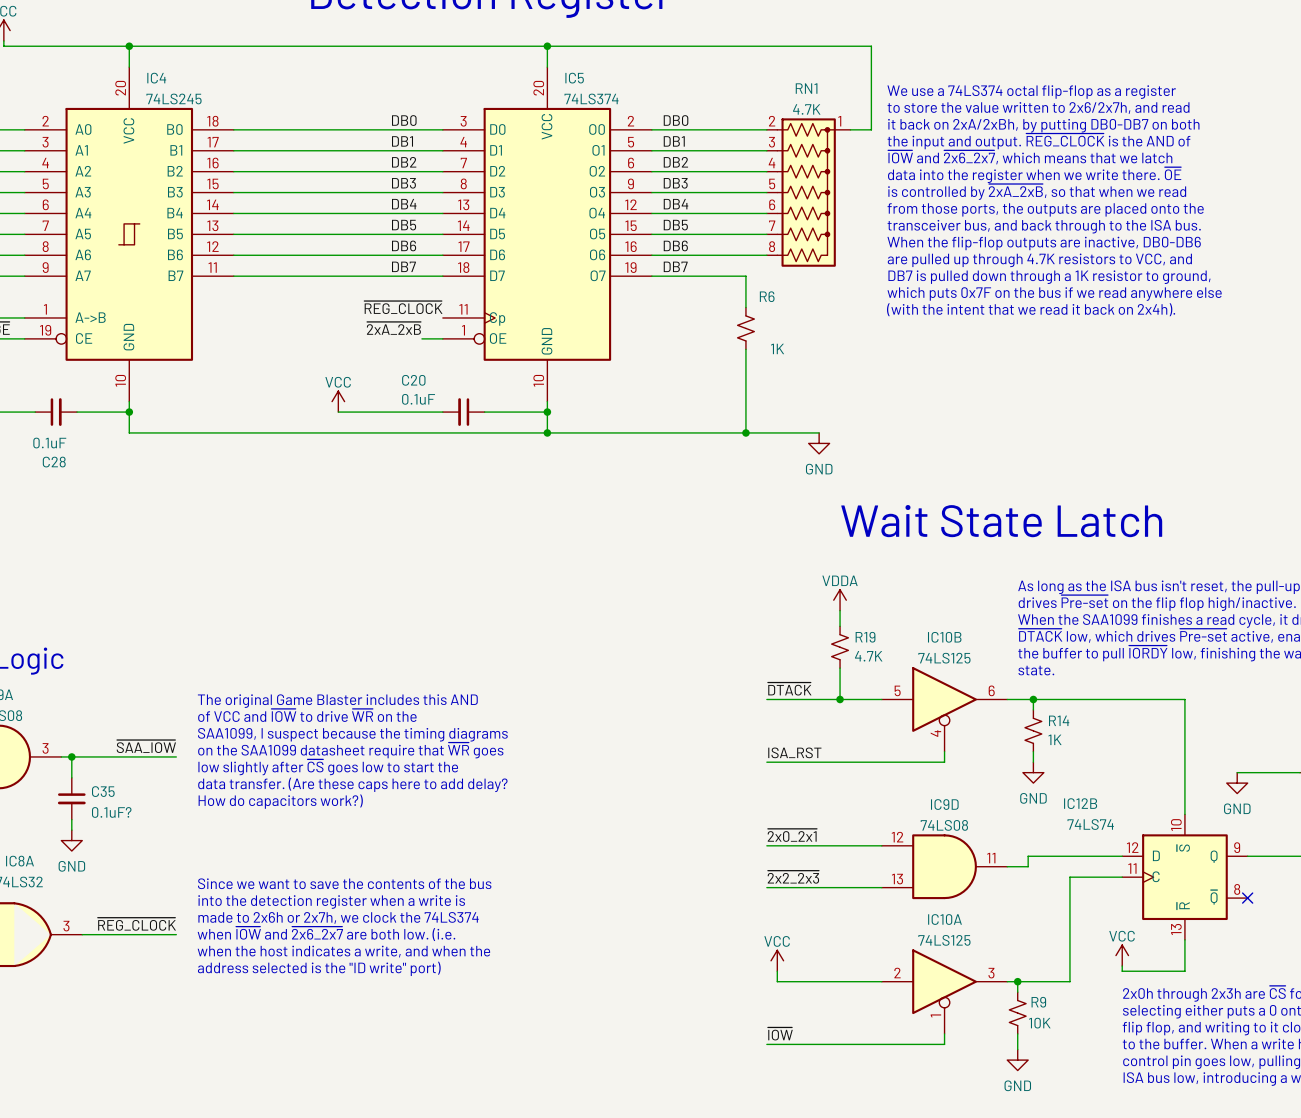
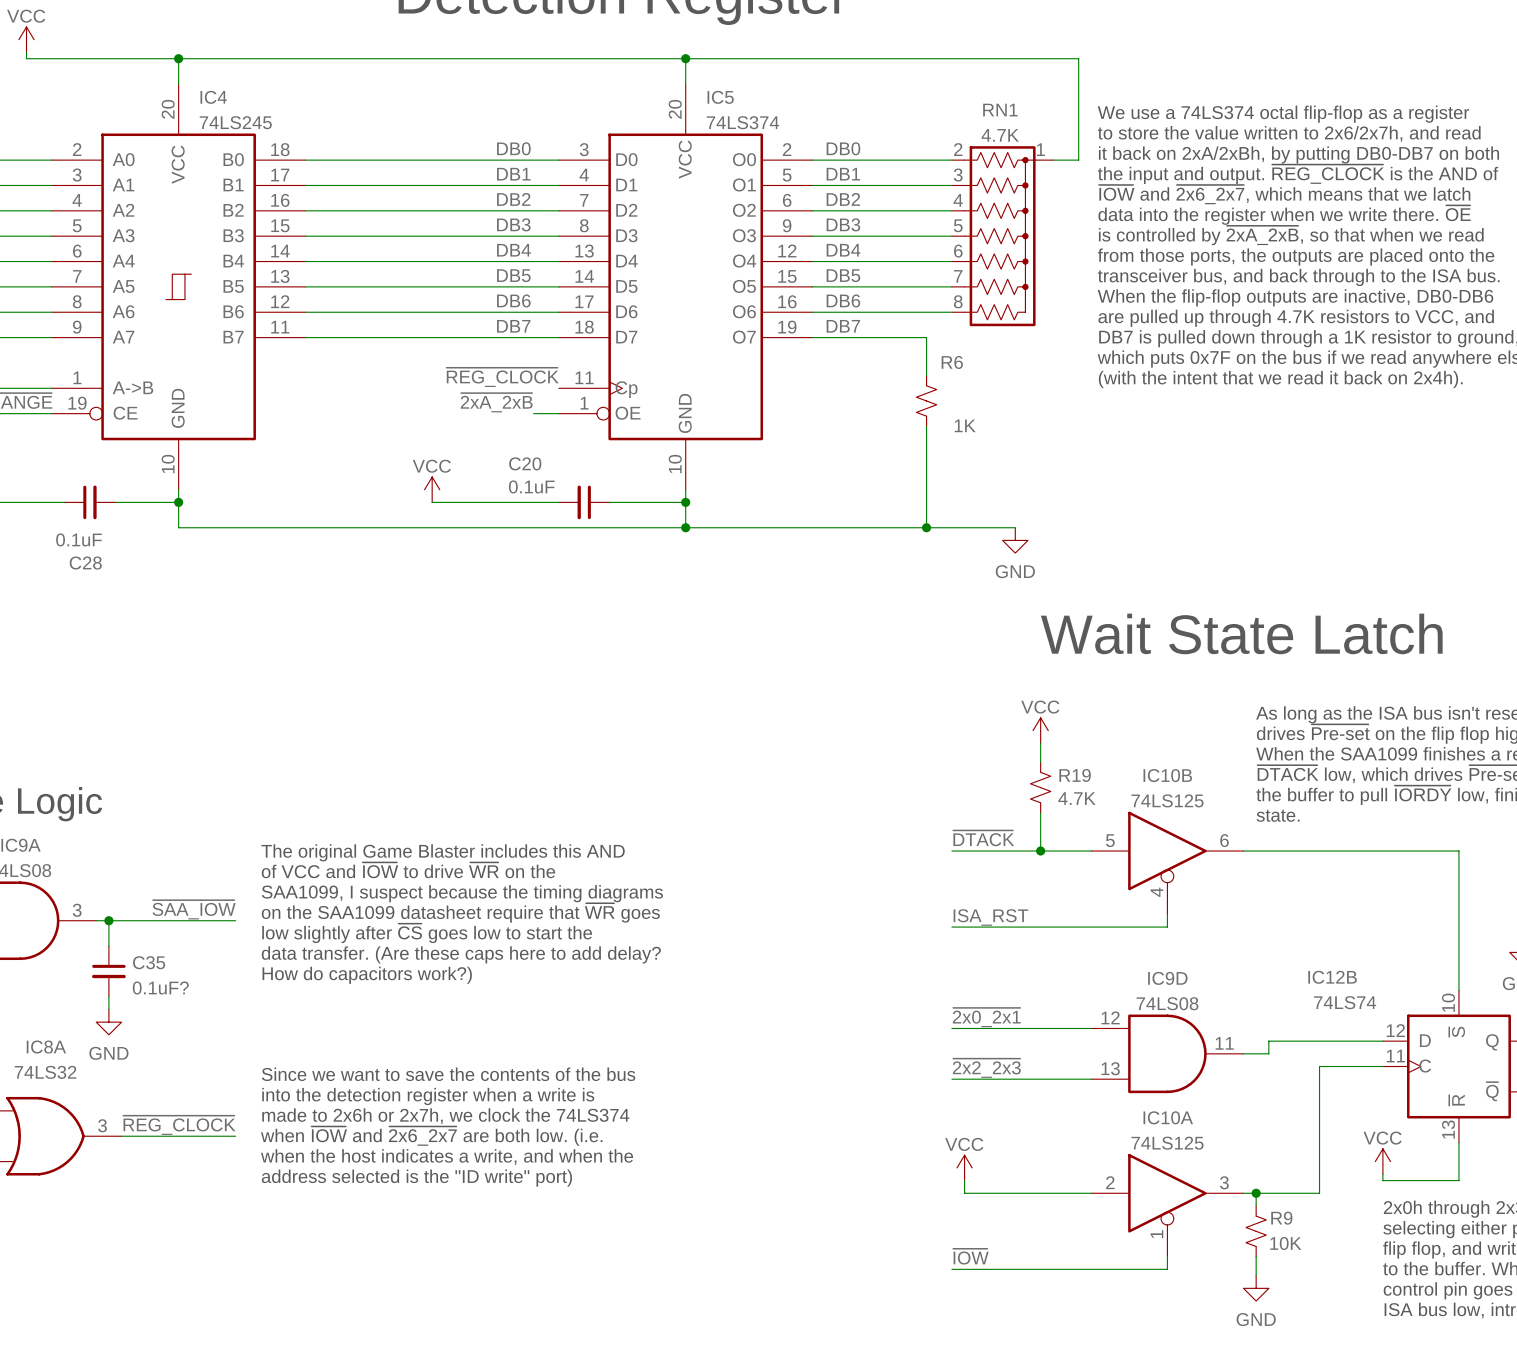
power symbol: VDDA (840, 600) -> VCC (1040, 730)
wire: (1033, 699) (1033, 709) -> none
junction: (1033, 699) -> none
R14: 1K (1033, 730) -> none
wire: (1033, 751) (1033, 762) -> none
power symbol: GND (1033, 772) -> none

